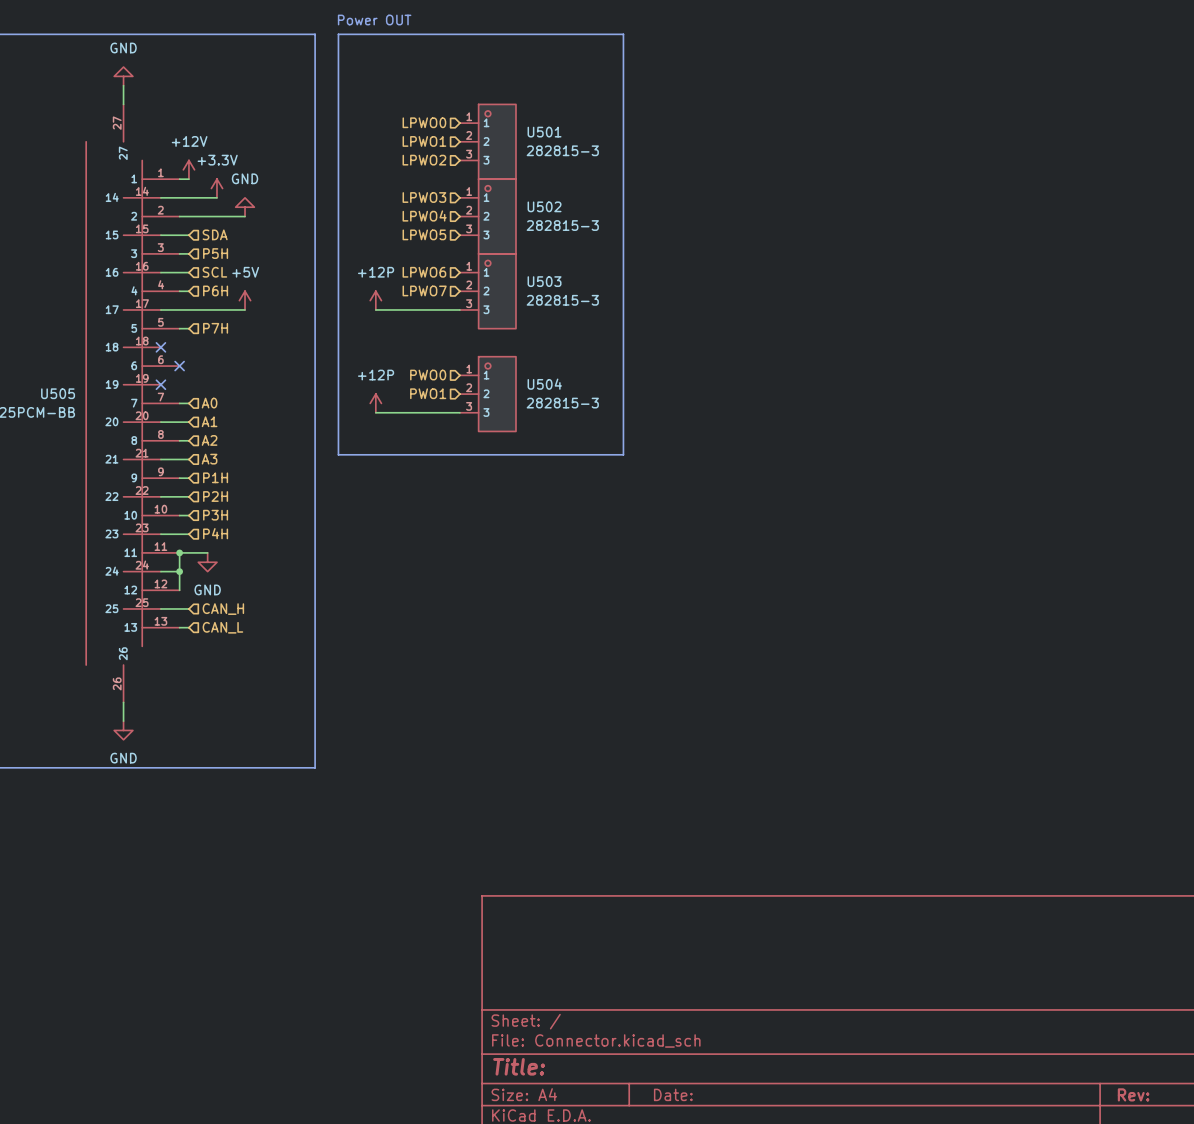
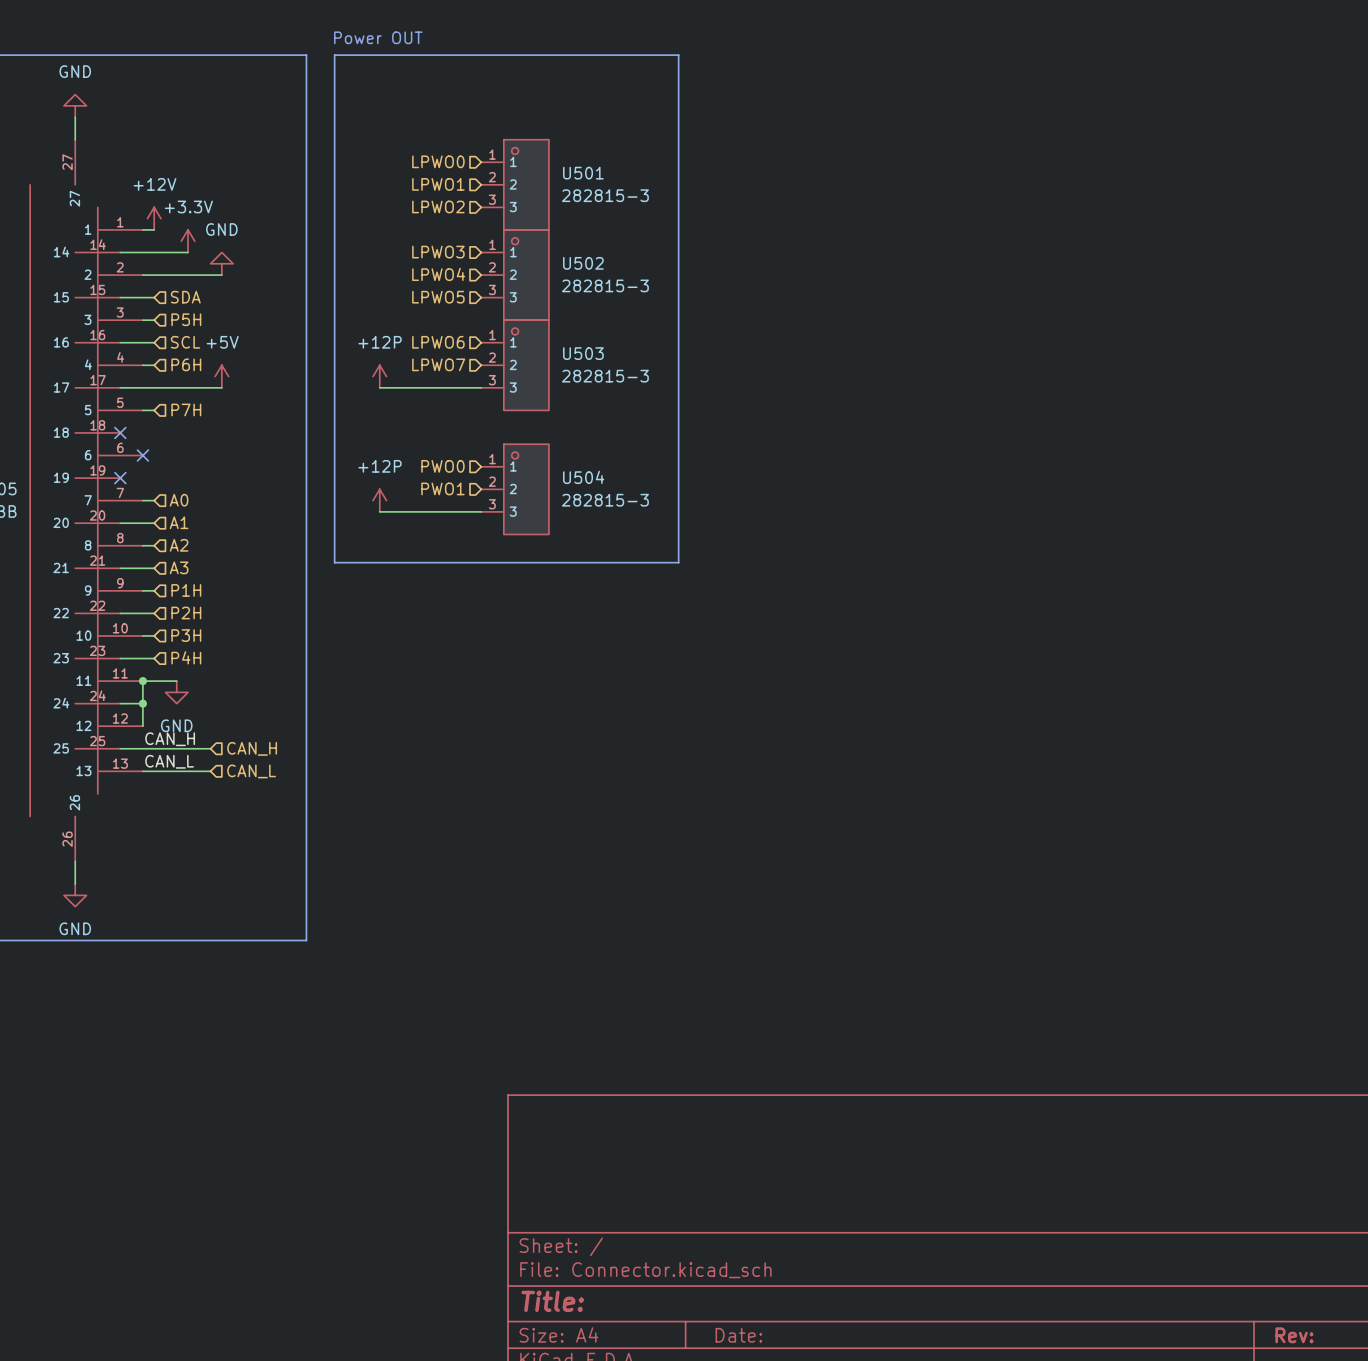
label: none -> CAN_H (170, 739)
wire: none -> (154, 748) (210, 748)
hierarchical label position: CAN_H (223, 609) -> CAN_H (252, 748)
label: none -> CAN_L (169, 761)
wire: none -> (154, 771) (210, 771)
hierarchical label position: CAN_L (222, 627) -> CAN_L (251, 771)

